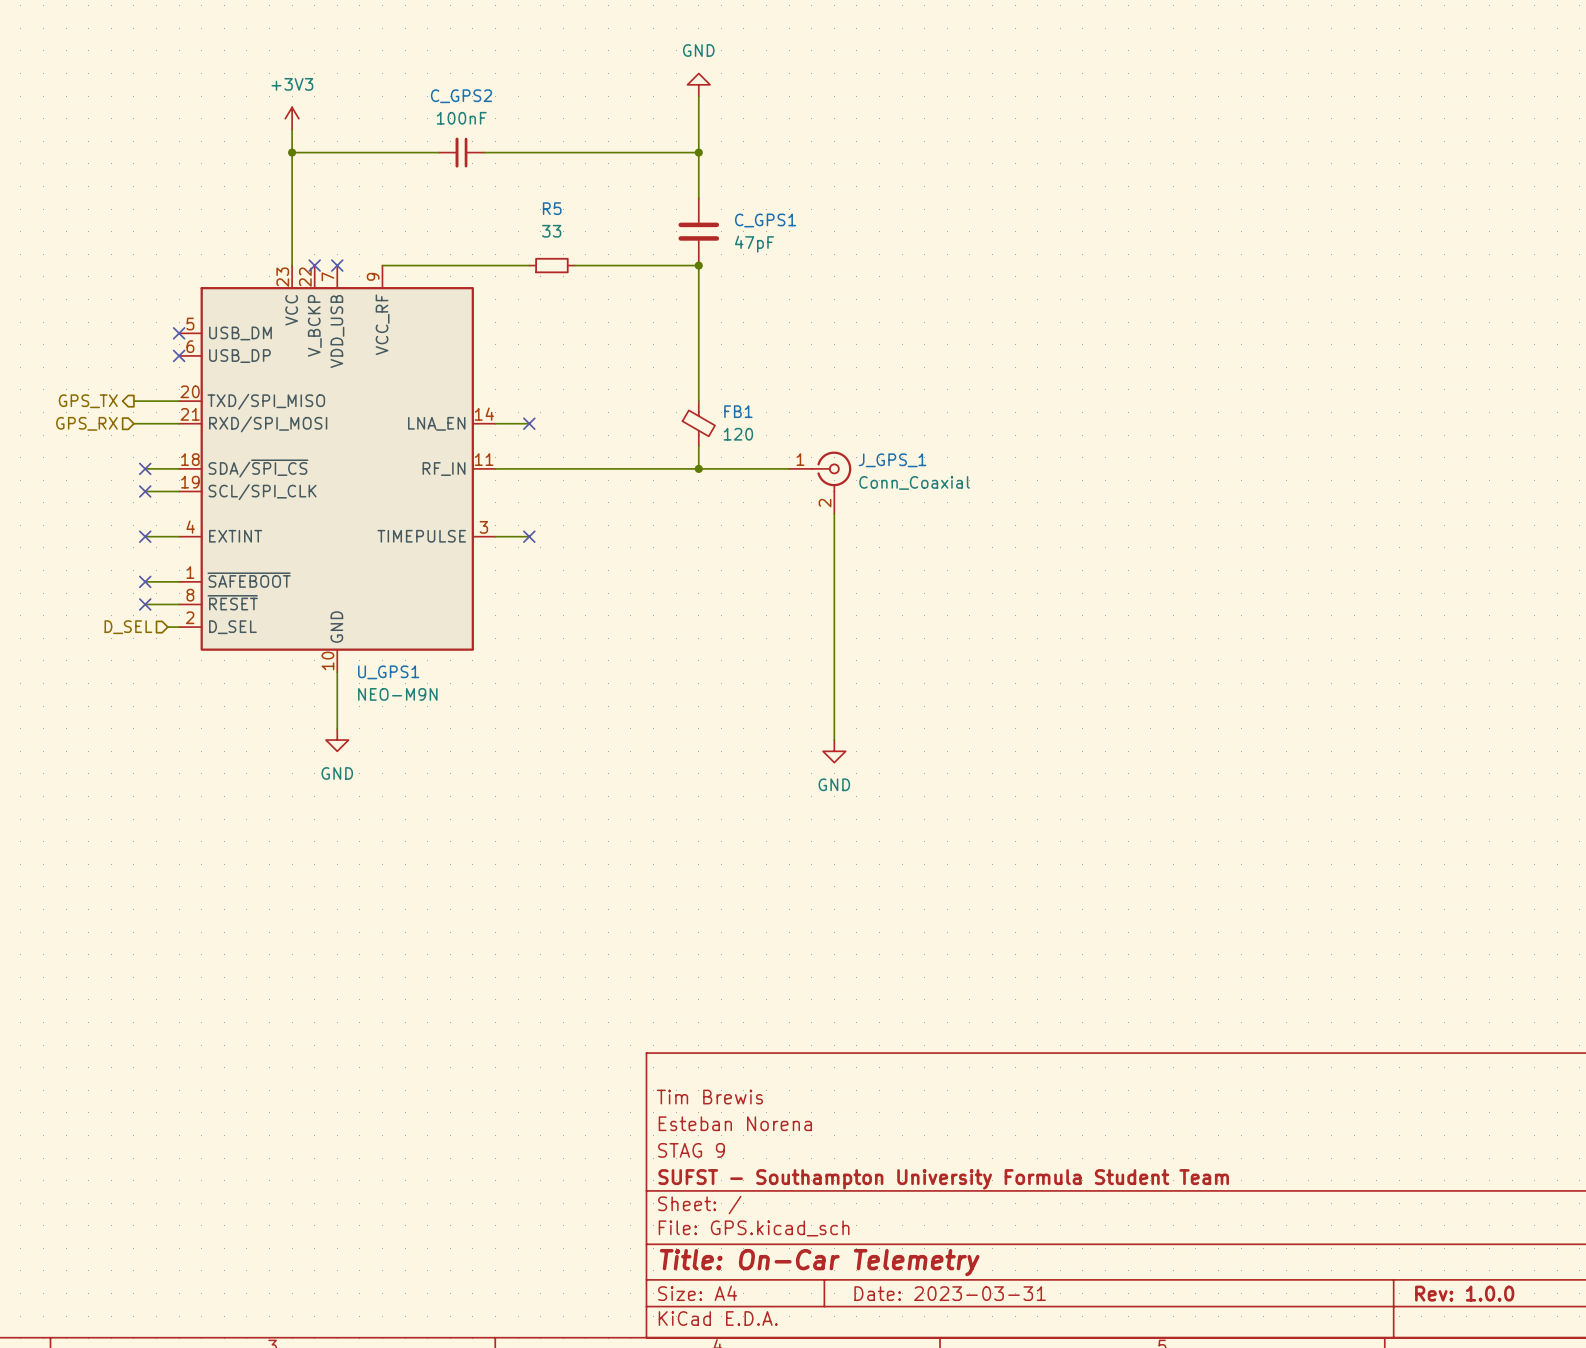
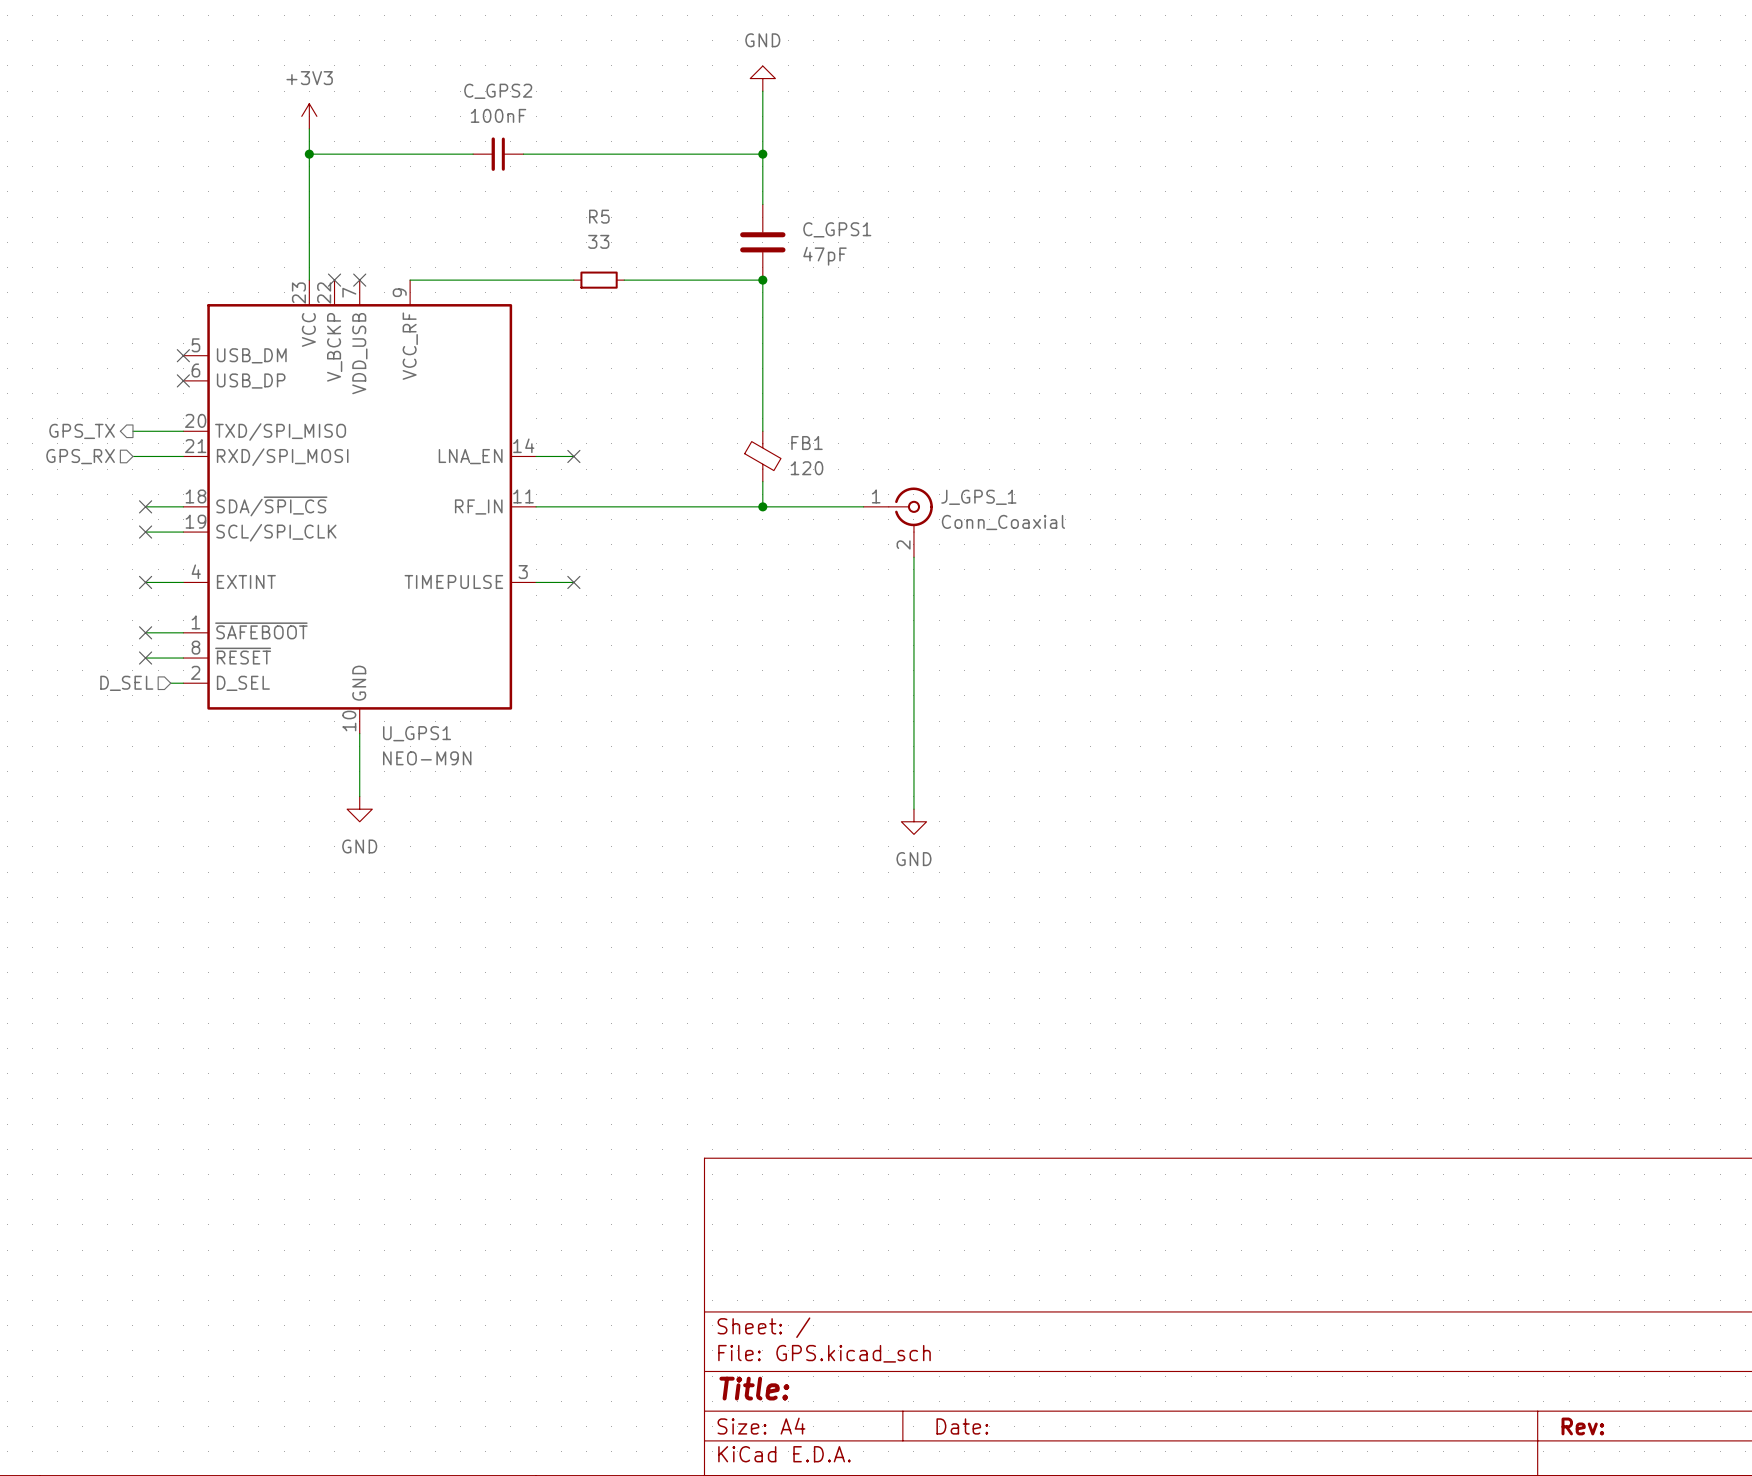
title block: Tim Brewis (709, 1097) -> none
title block: Esteban Norena (735, 1123) -> none
title block: STAG 9 (691, 1150) -> none
title block: SUFST - Southampton University Formula Student Team (943, 1179) -> none
title block: Title: On-Car Telemetry (819, 1262) -> Title: (754, 1388)
title block: Date: 2023-03-31 (950, 1293) -> Date: (962, 1426)
title block: Rev: 1.0.0 (1464, 1293) -> Rev: (1582, 1426)

